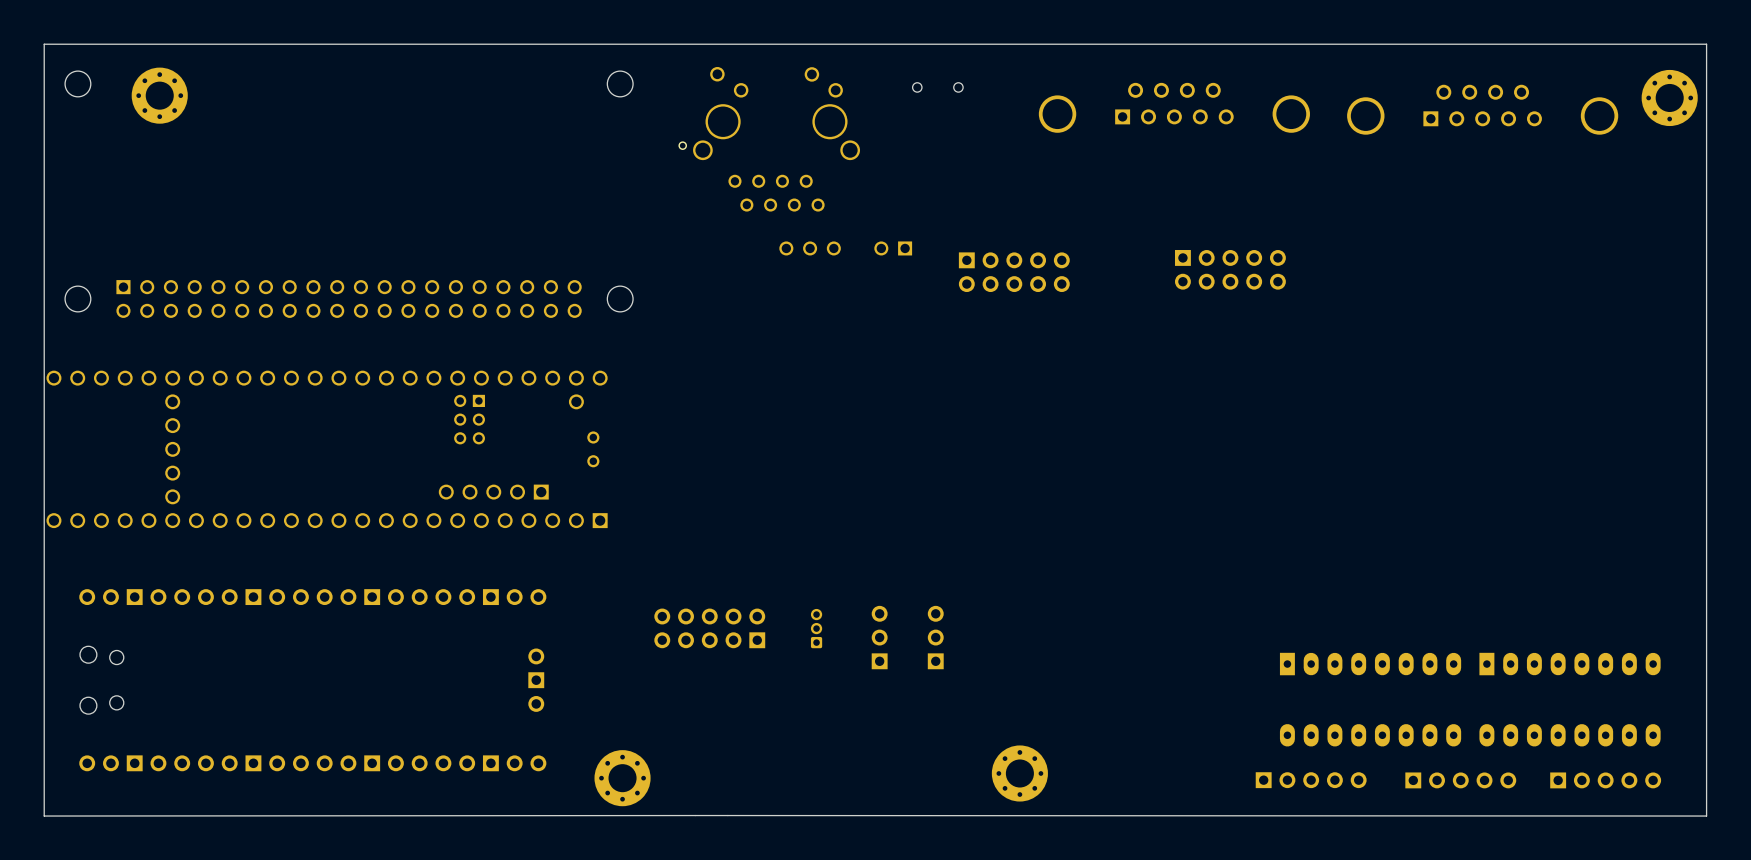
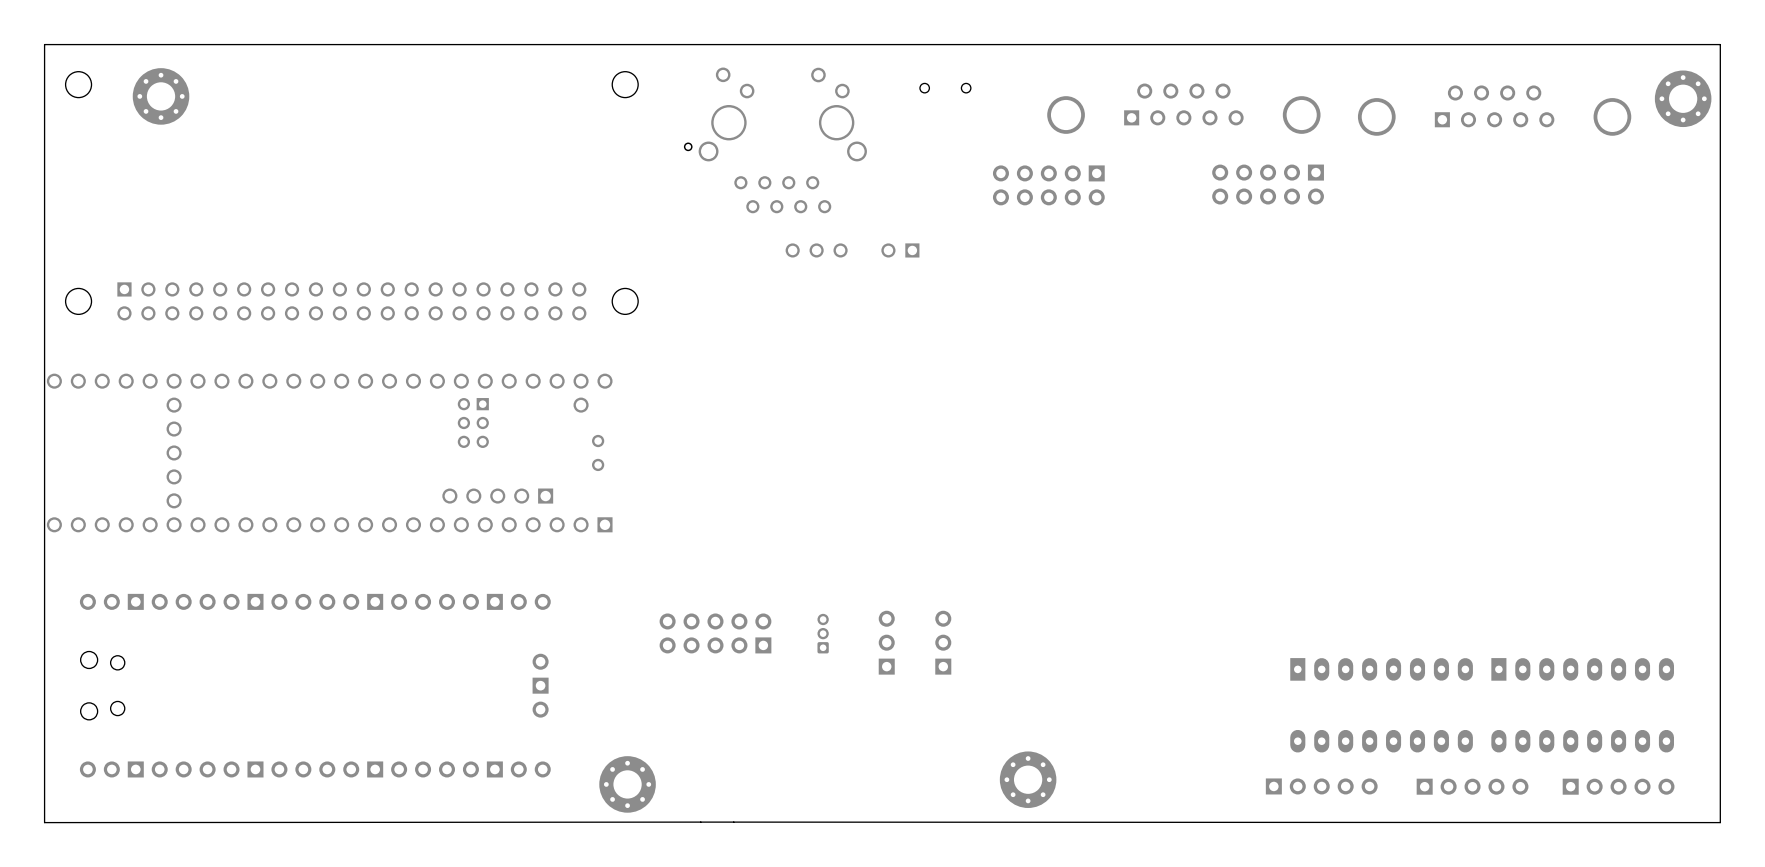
part: none -> (1048, 185)
part: none -> (1268, 184)
part: (1230, 269) -> none
part: (1014, 272) -> none

